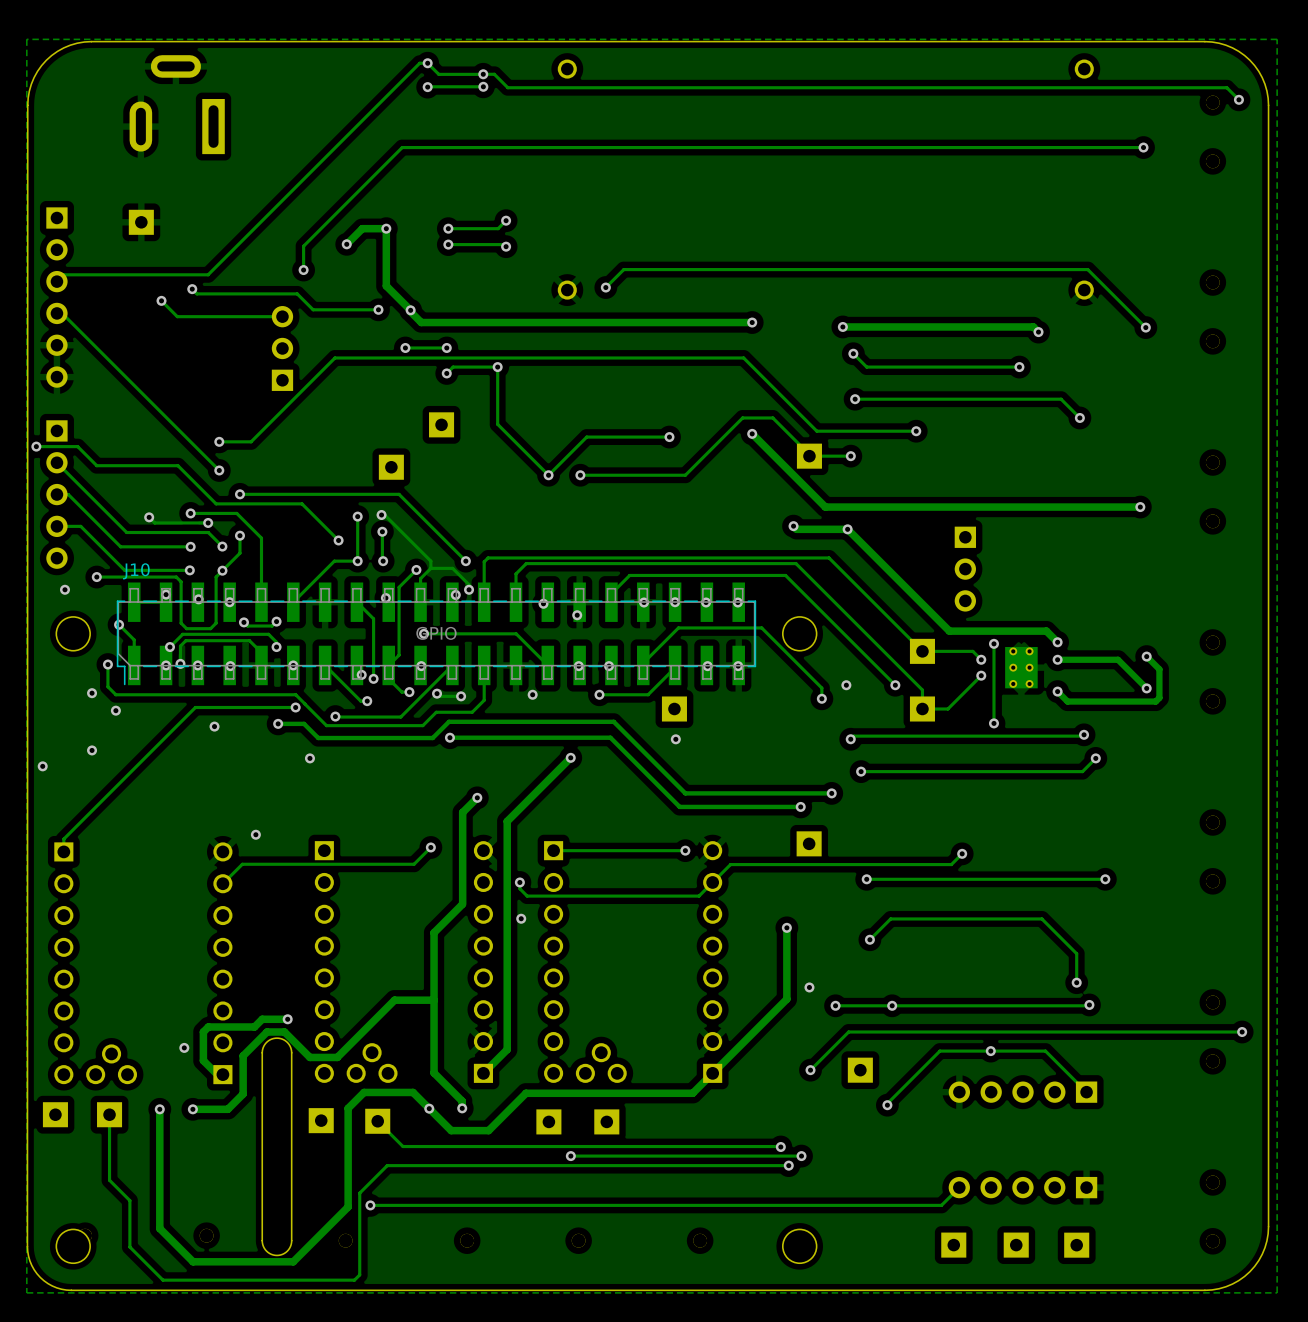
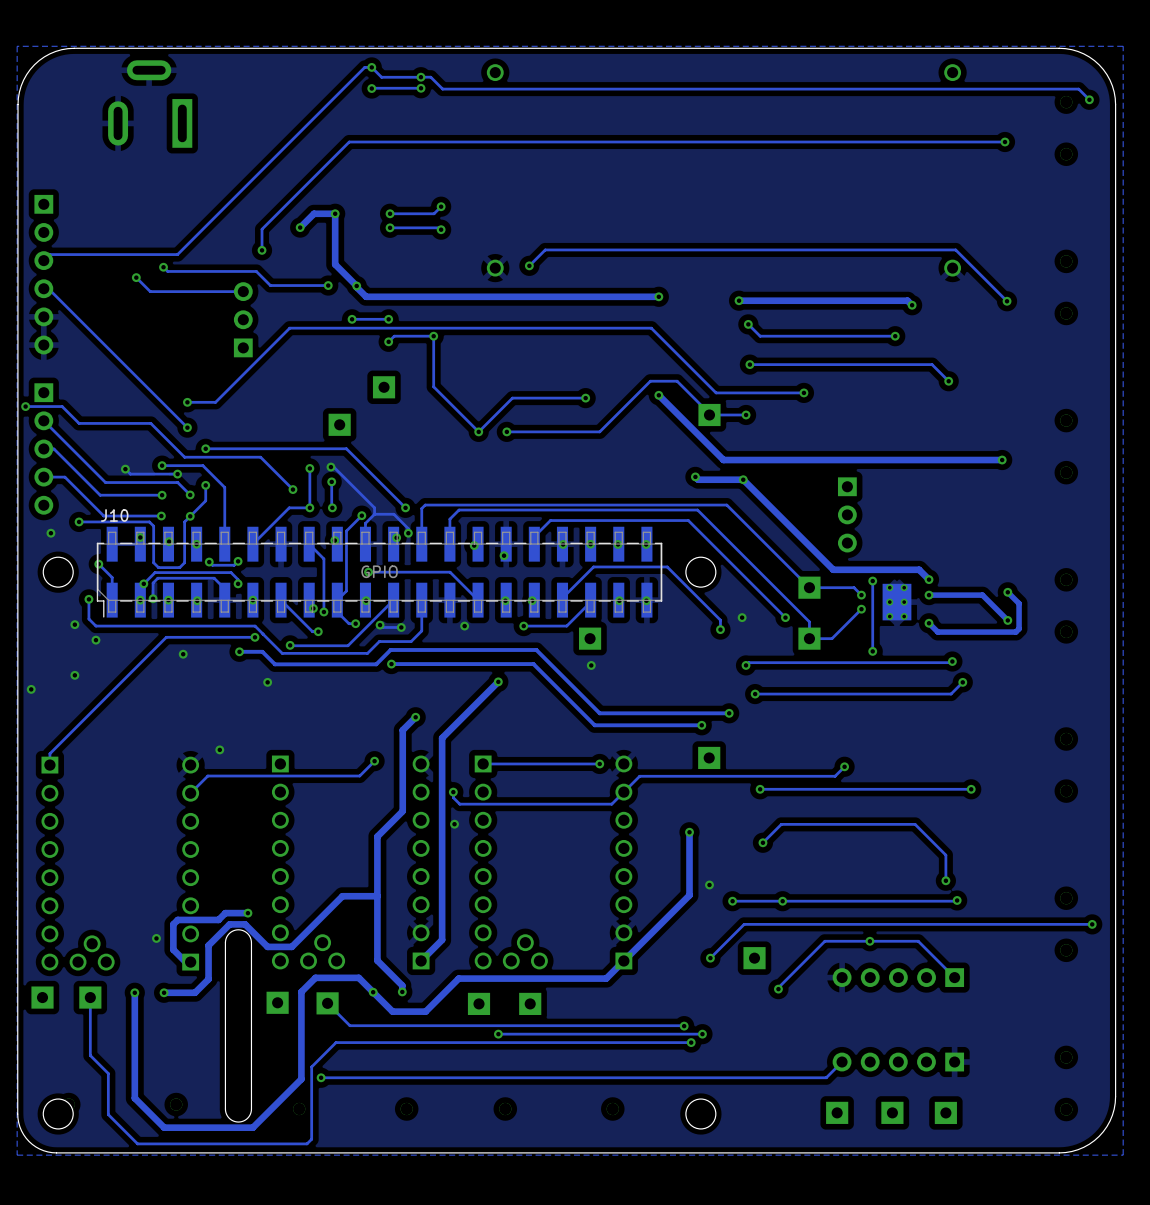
part: (141, 222) -> none

